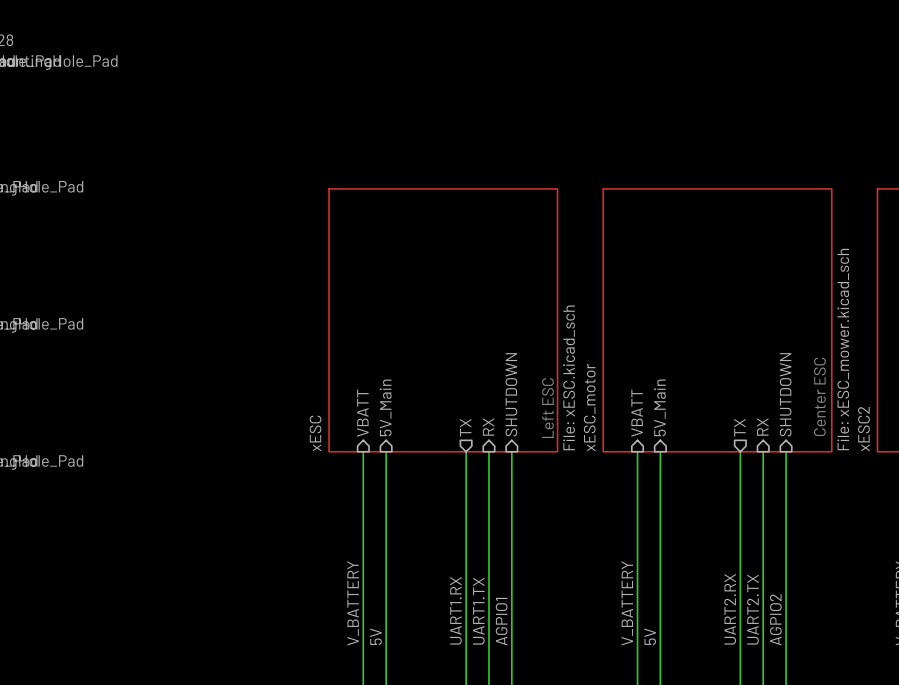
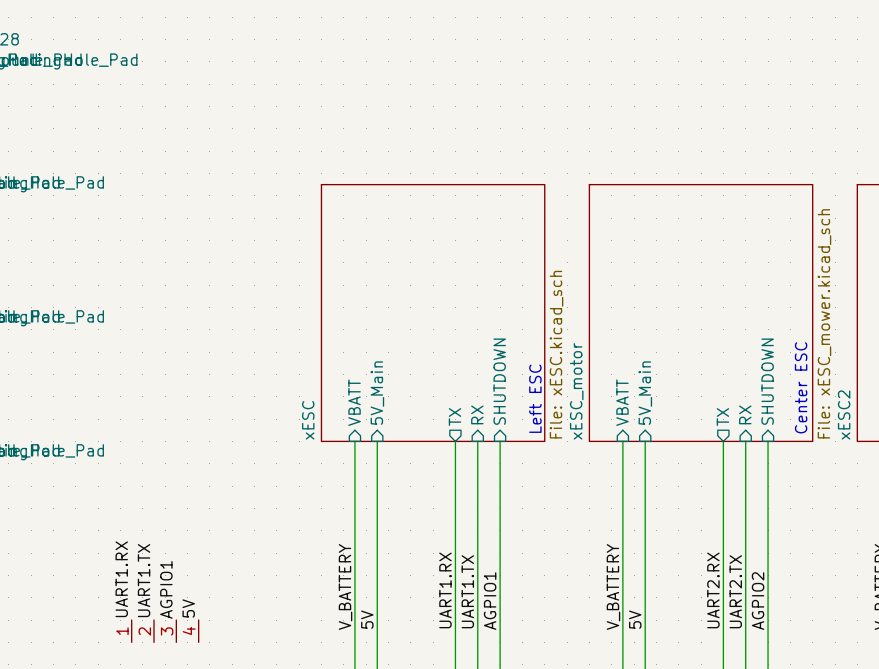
label: none -> UART1.RX (121, 579)
label: none -> UART1.TX (144, 580)
label: none -> AGPIO1 (166, 589)
label: none -> 5V (188, 608)
part: none -> (165, 631)

